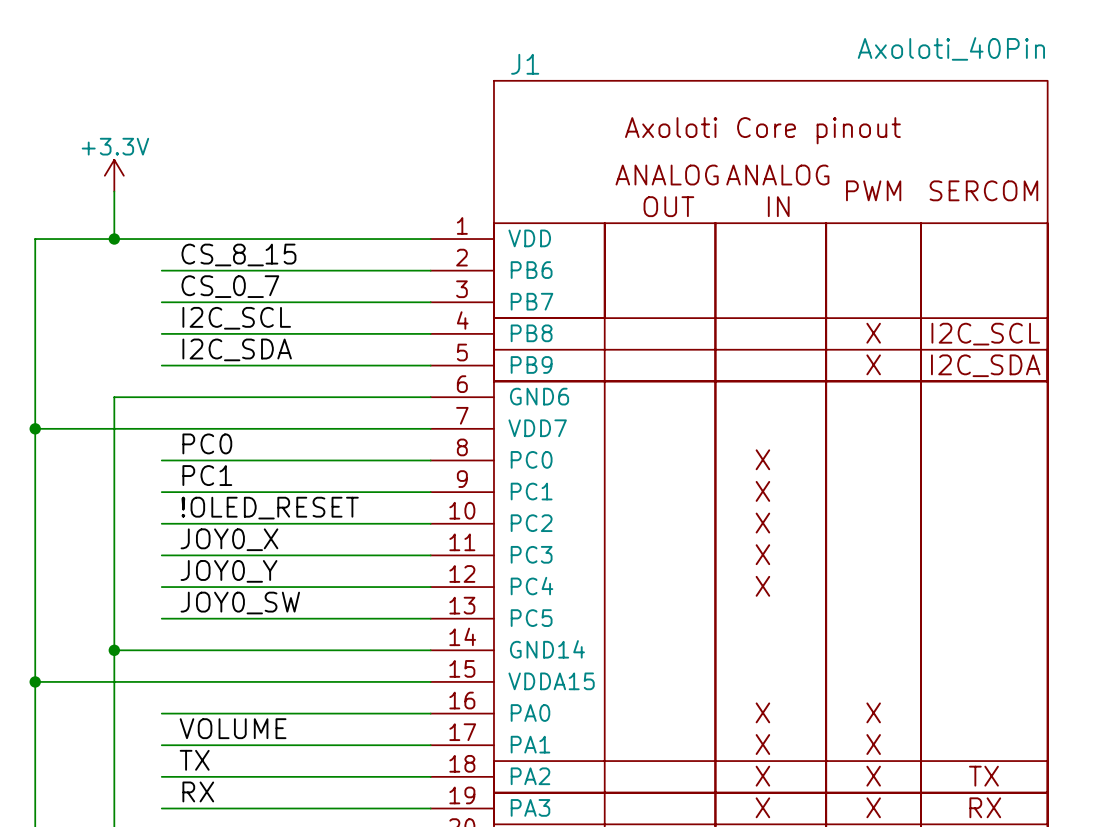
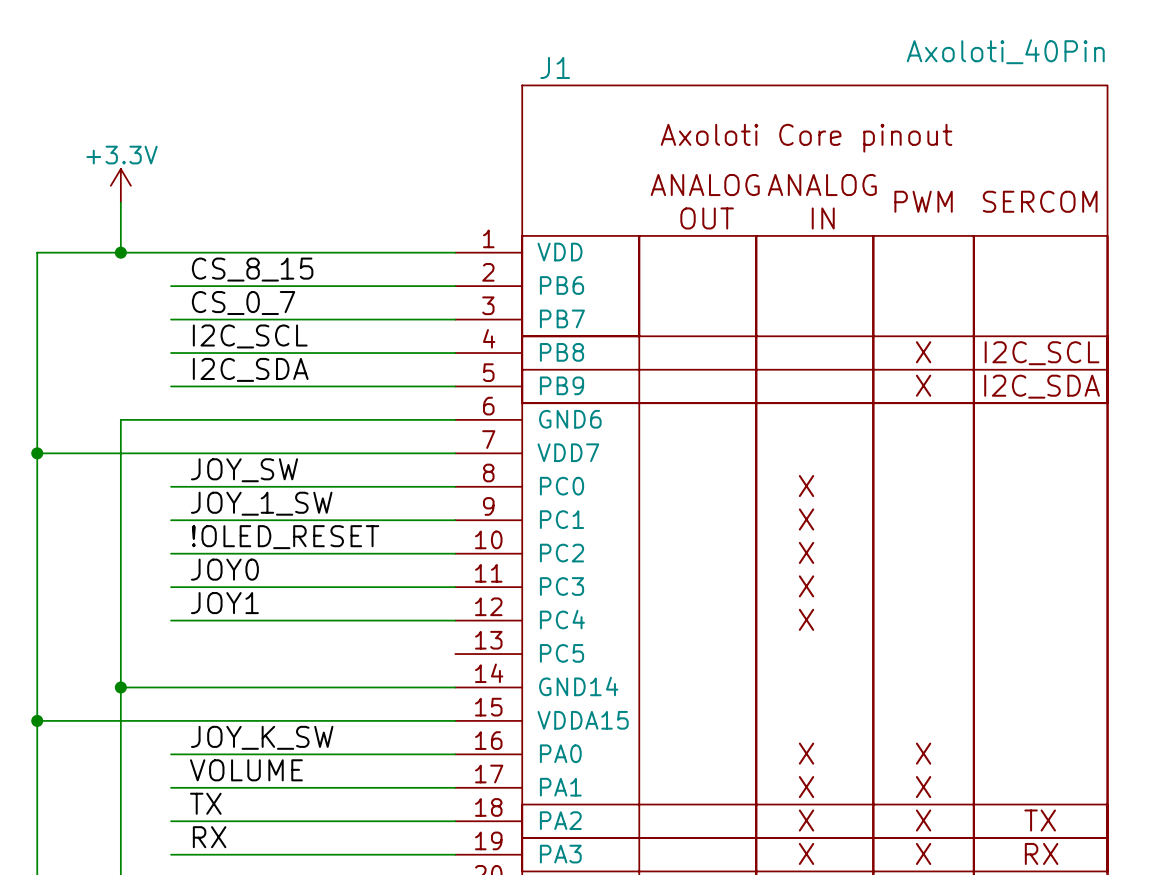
label: PC0 (207, 443) -> JOY_SW (244, 470)
label: PC1 (207, 475) -> JOY_1_SW (261, 503)
label: JOY0_X (229, 539) -> JOY0 (224, 569)
label: JOY0_Y (229, 571) -> JOY1 (224, 603)
label: JOY0_SW (240, 603) -> none
wire: (161, 618) (430, 618) -> none
label: none -> JOY_K_SW (262, 737)

